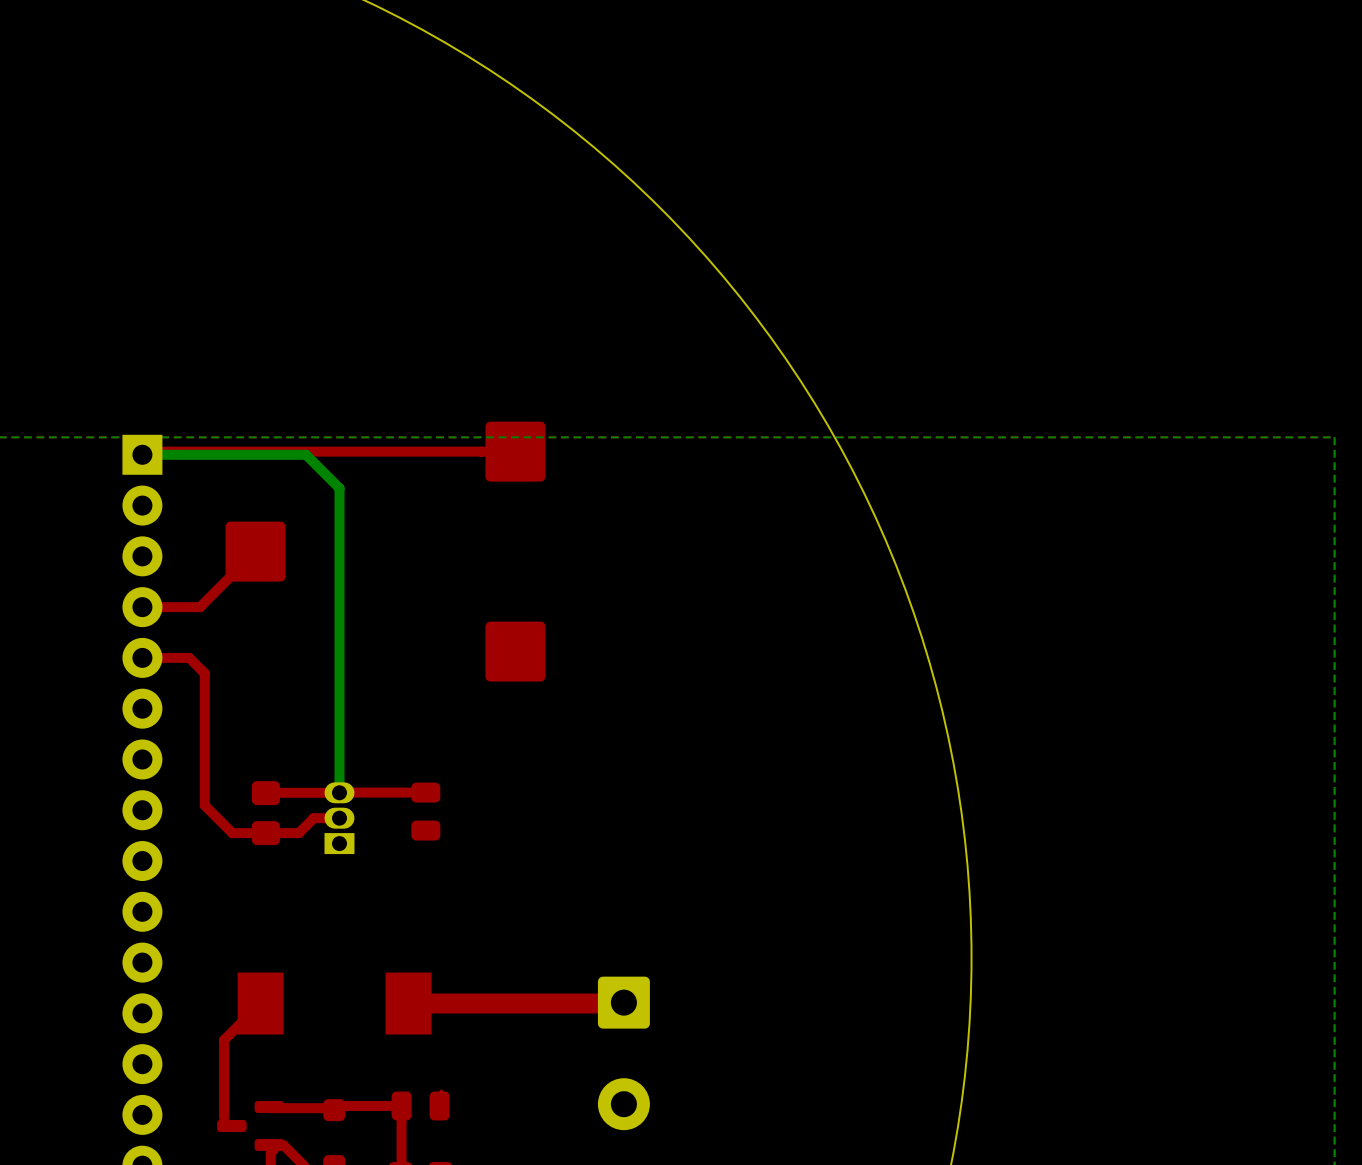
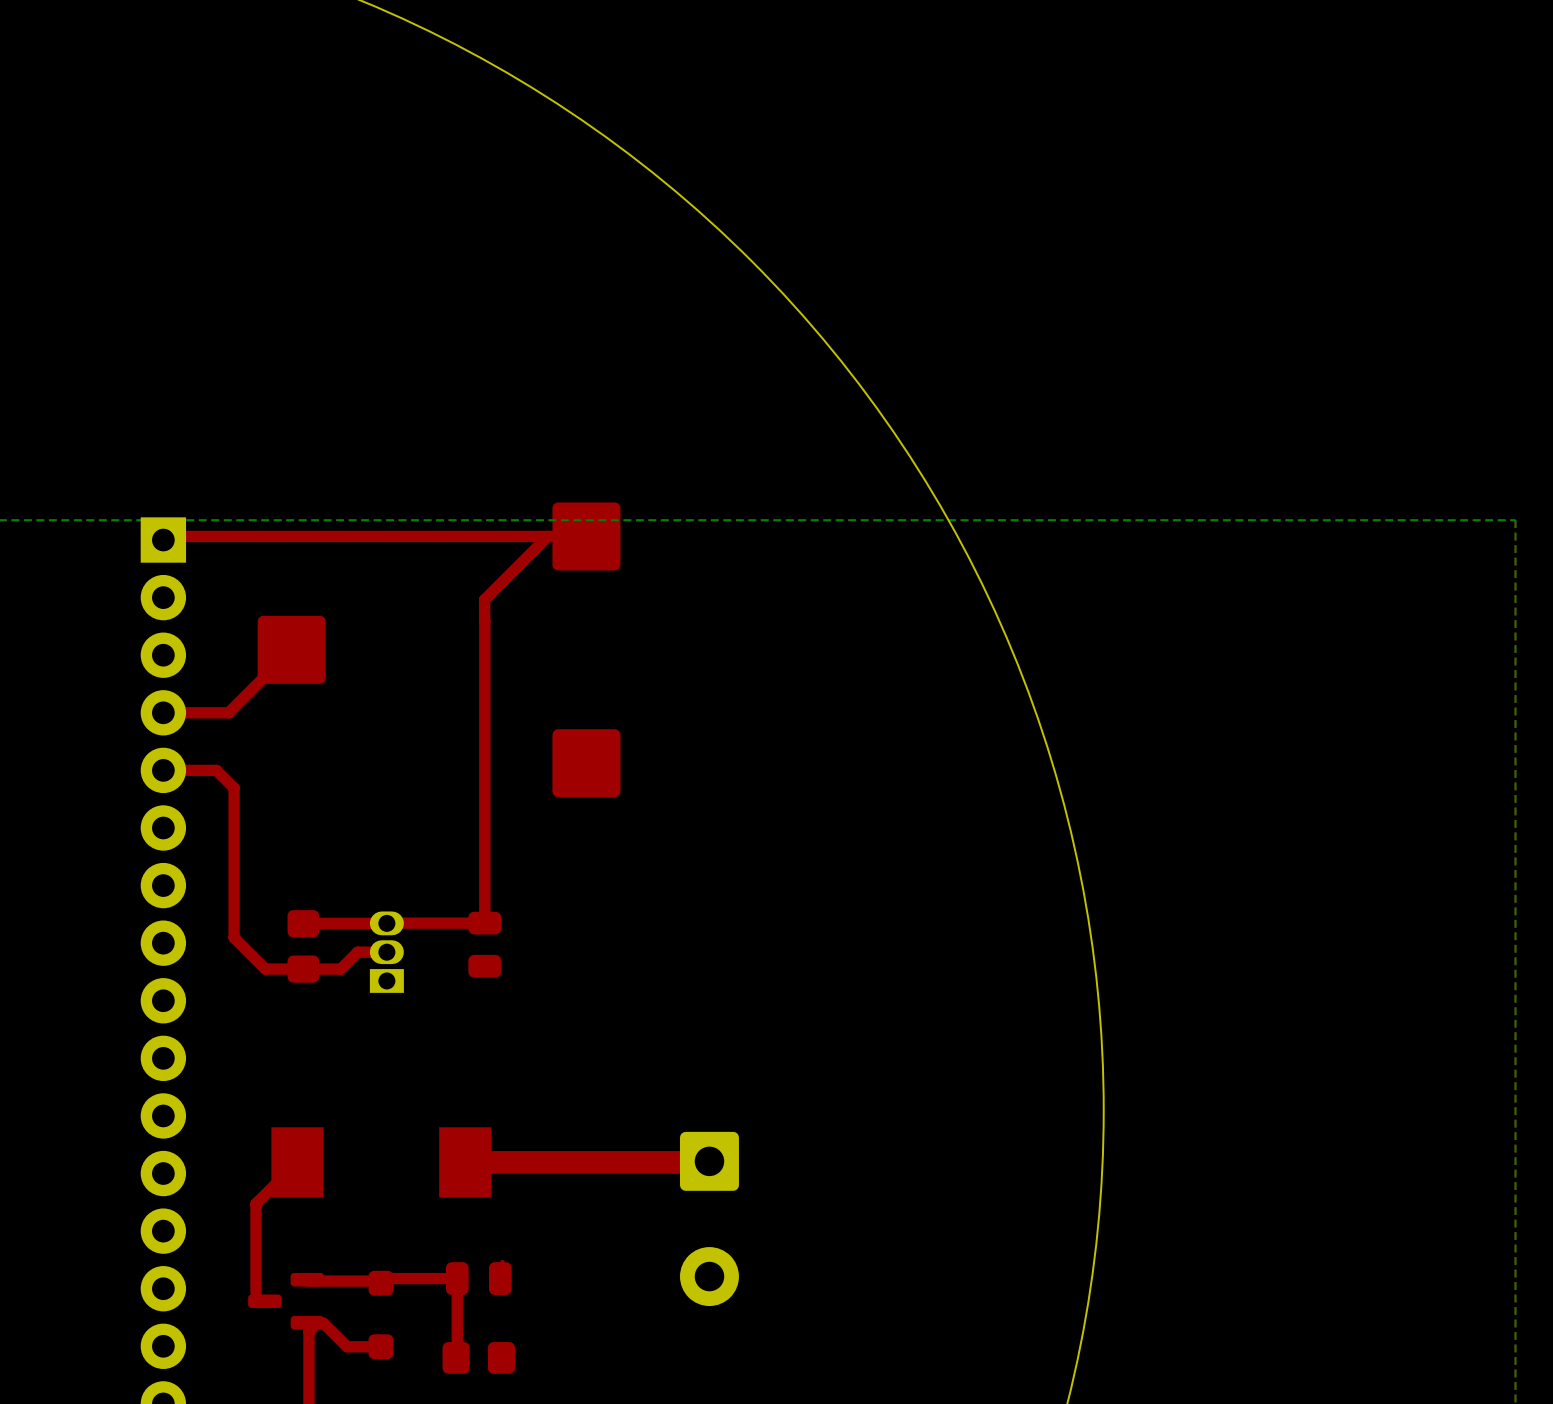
top track: none -> (547, 536) (484, 599) (484, 621)
bottom track: (142, 454) (306, 454) (339, 488) (339, 792) -> none
top track: none -> (484, 621) (484, 923)

